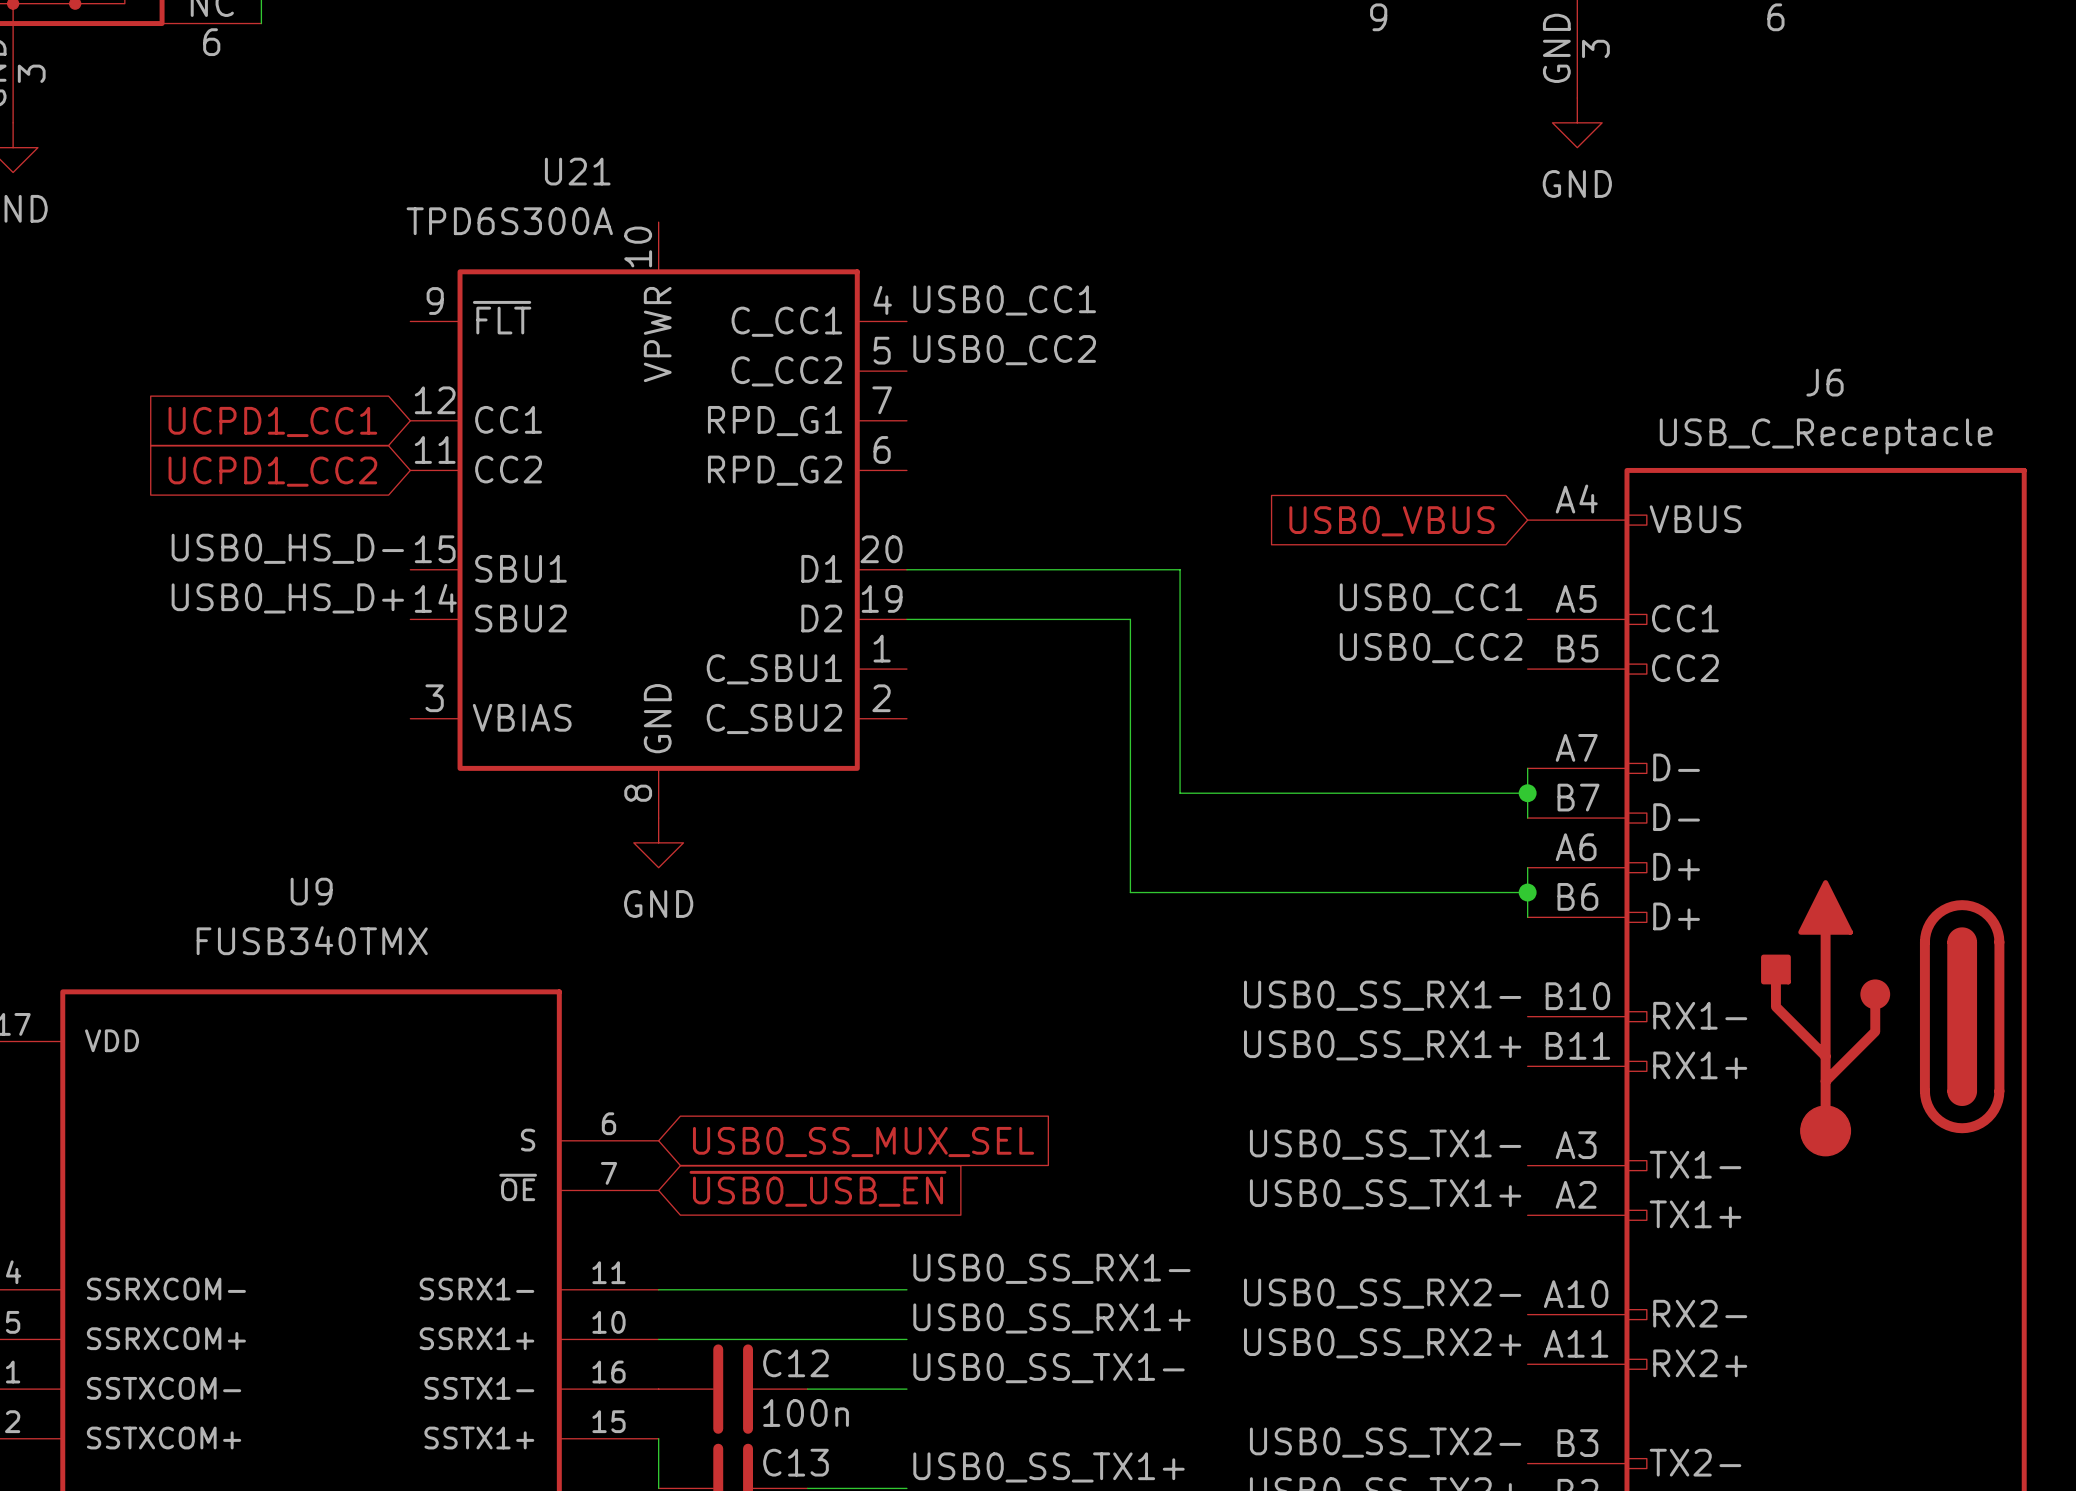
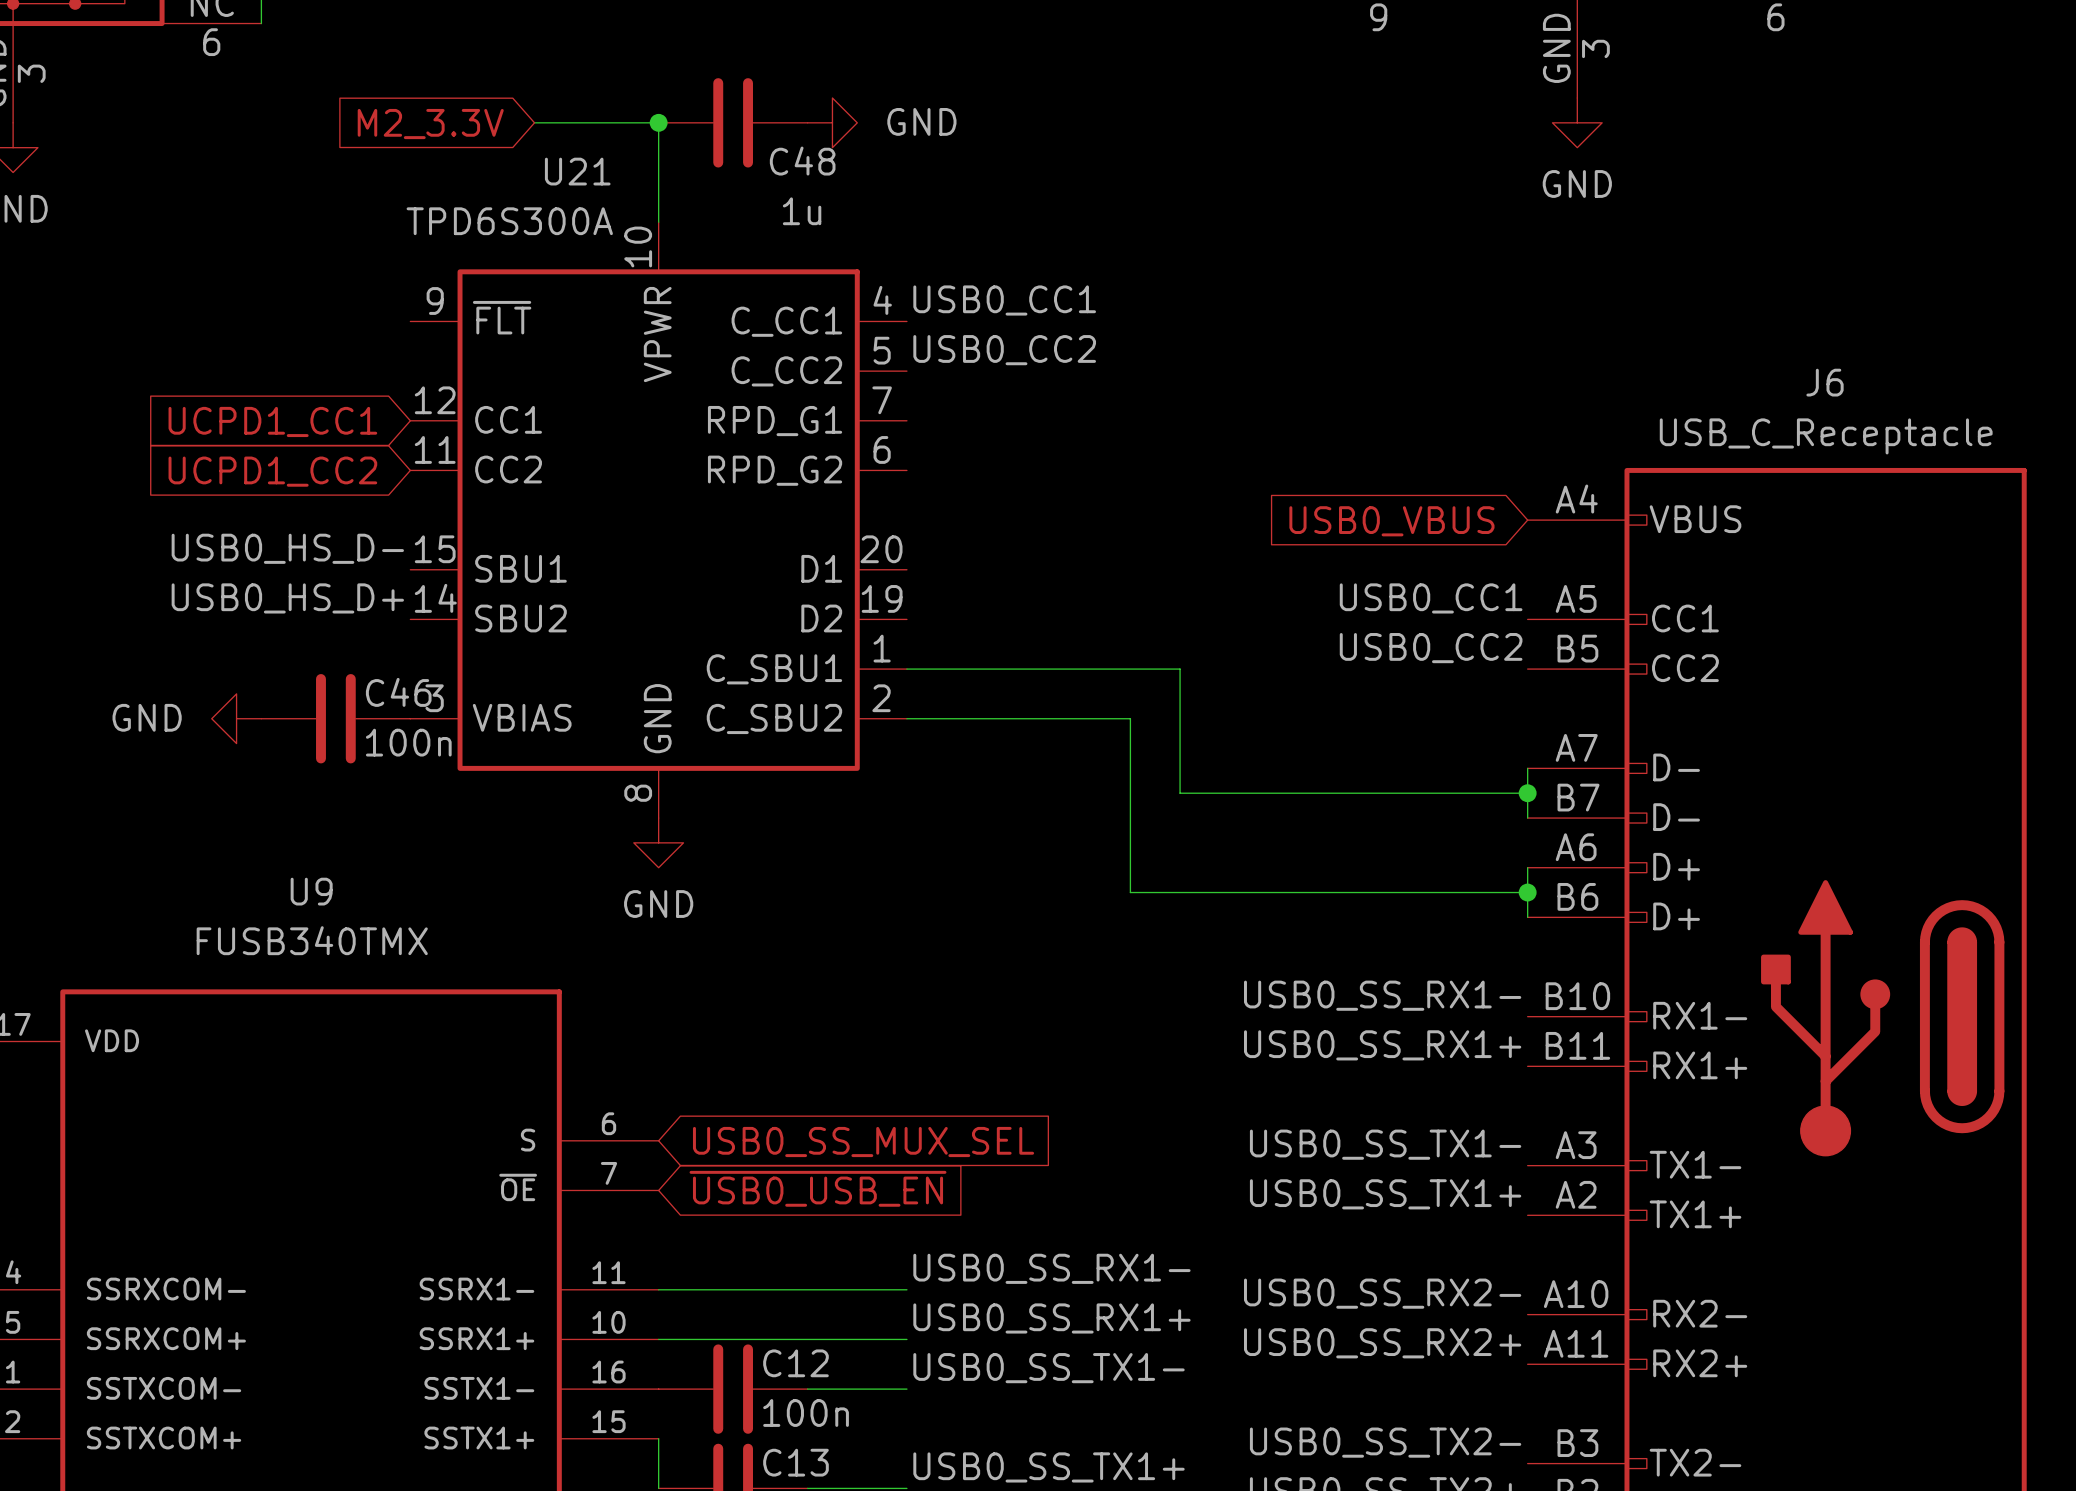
wire: none -> (534, 122) (658, 122) (658, 222)
junction: none -> (658, 122)
C48: none -> 1u (733, 122)
power symbol: none -> GND (832, 122)
global label: none -> M2_3.3V (430, 124)
wire: (906, 569) (1180, 569) (1180, 669) -> (906, 669) (1180, 669)
wire: (906, 619) (1130, 619) (1130, 718) -> (906, 718) (1130, 718)
power symbol: none -> GND (236, 718)
C46: none -> 100n (335, 718)

